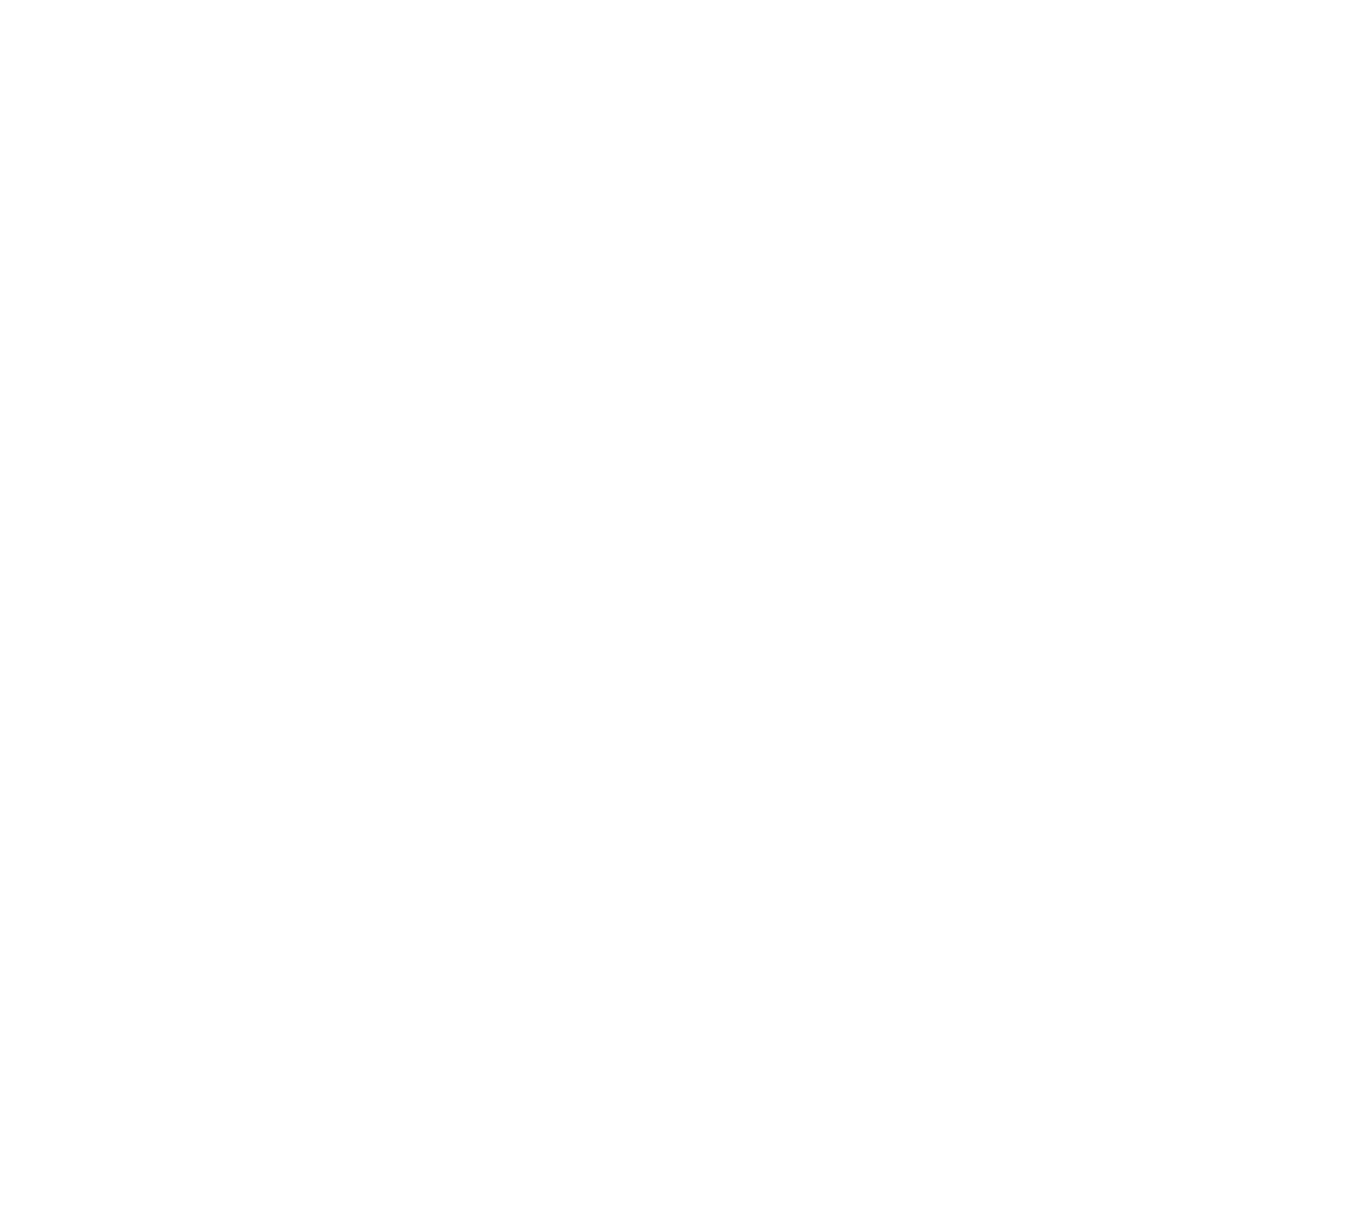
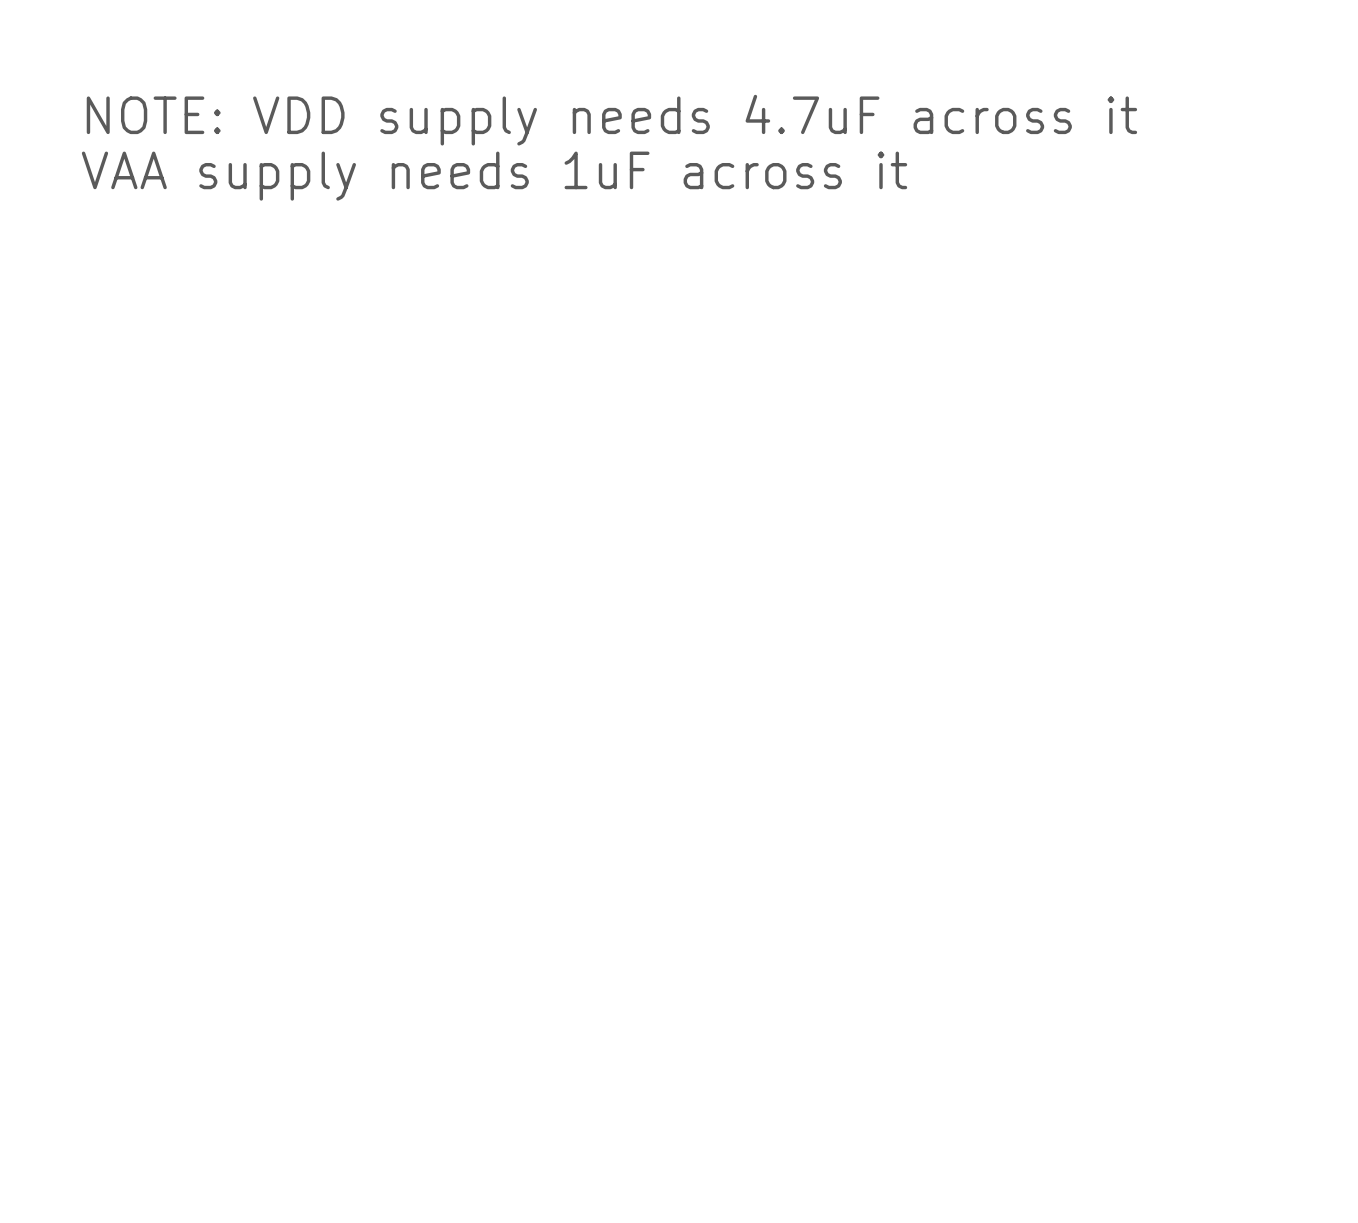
text: none -> NOTE: VDD supply needs 4.7uF across it (611, 120)
text: none -> VAA supply needs 1uF across it (494, 176)

